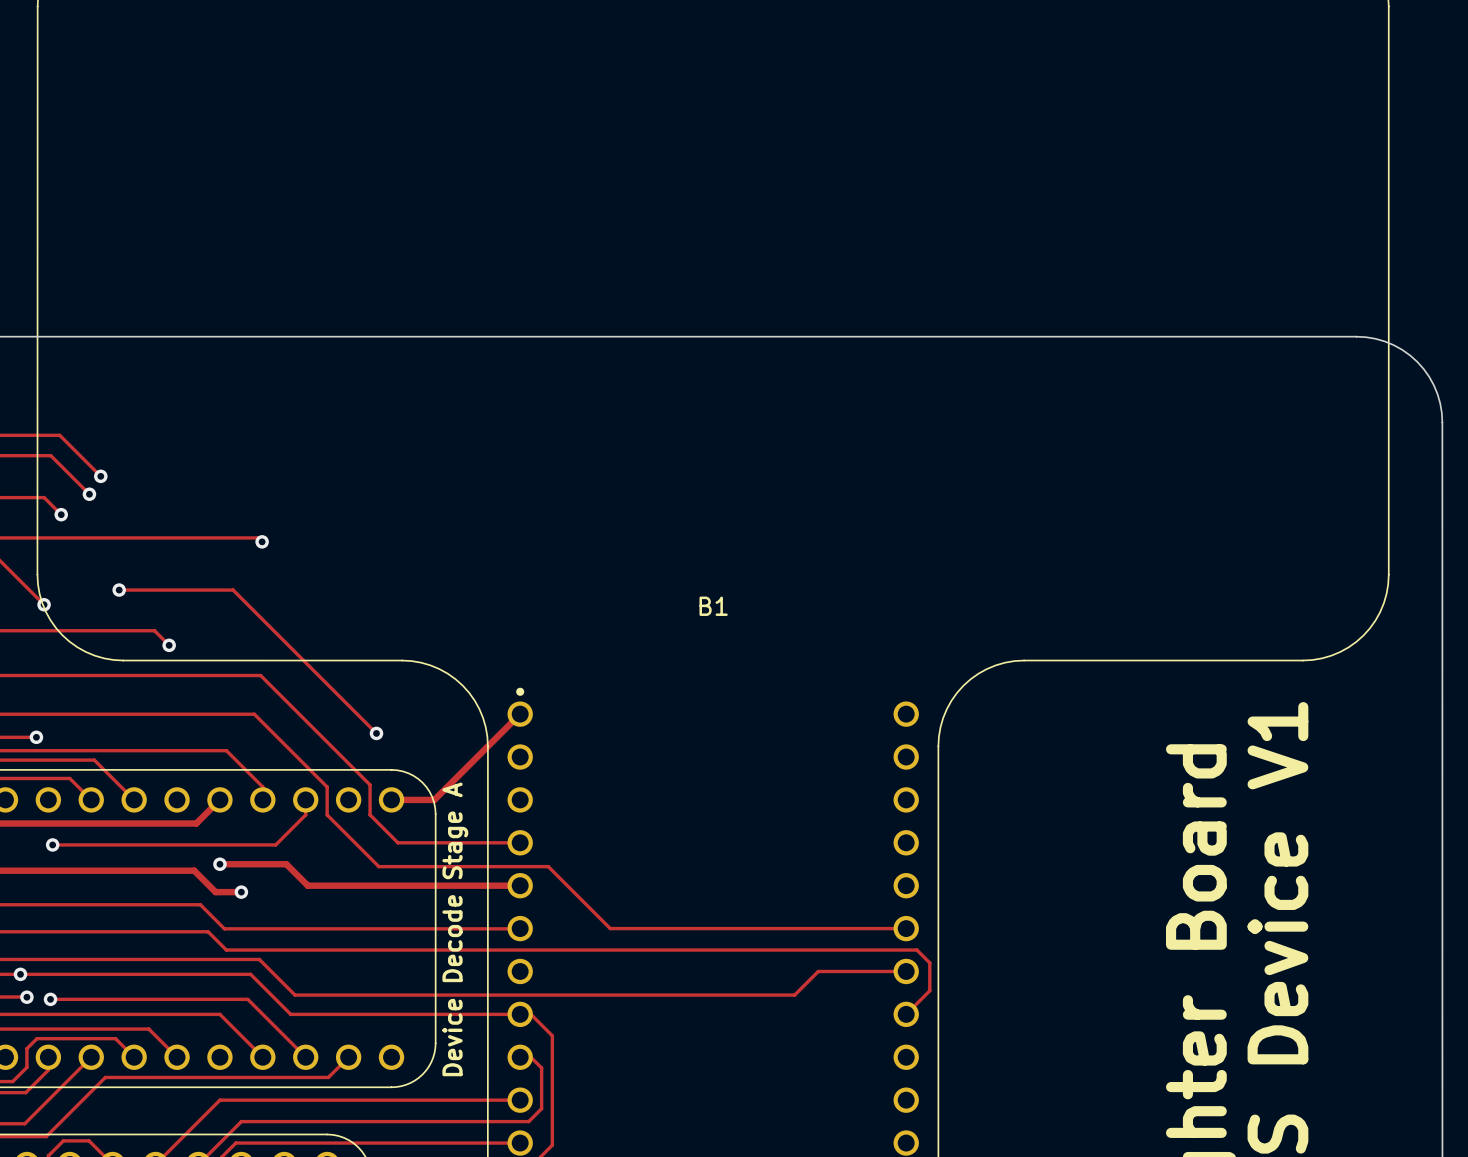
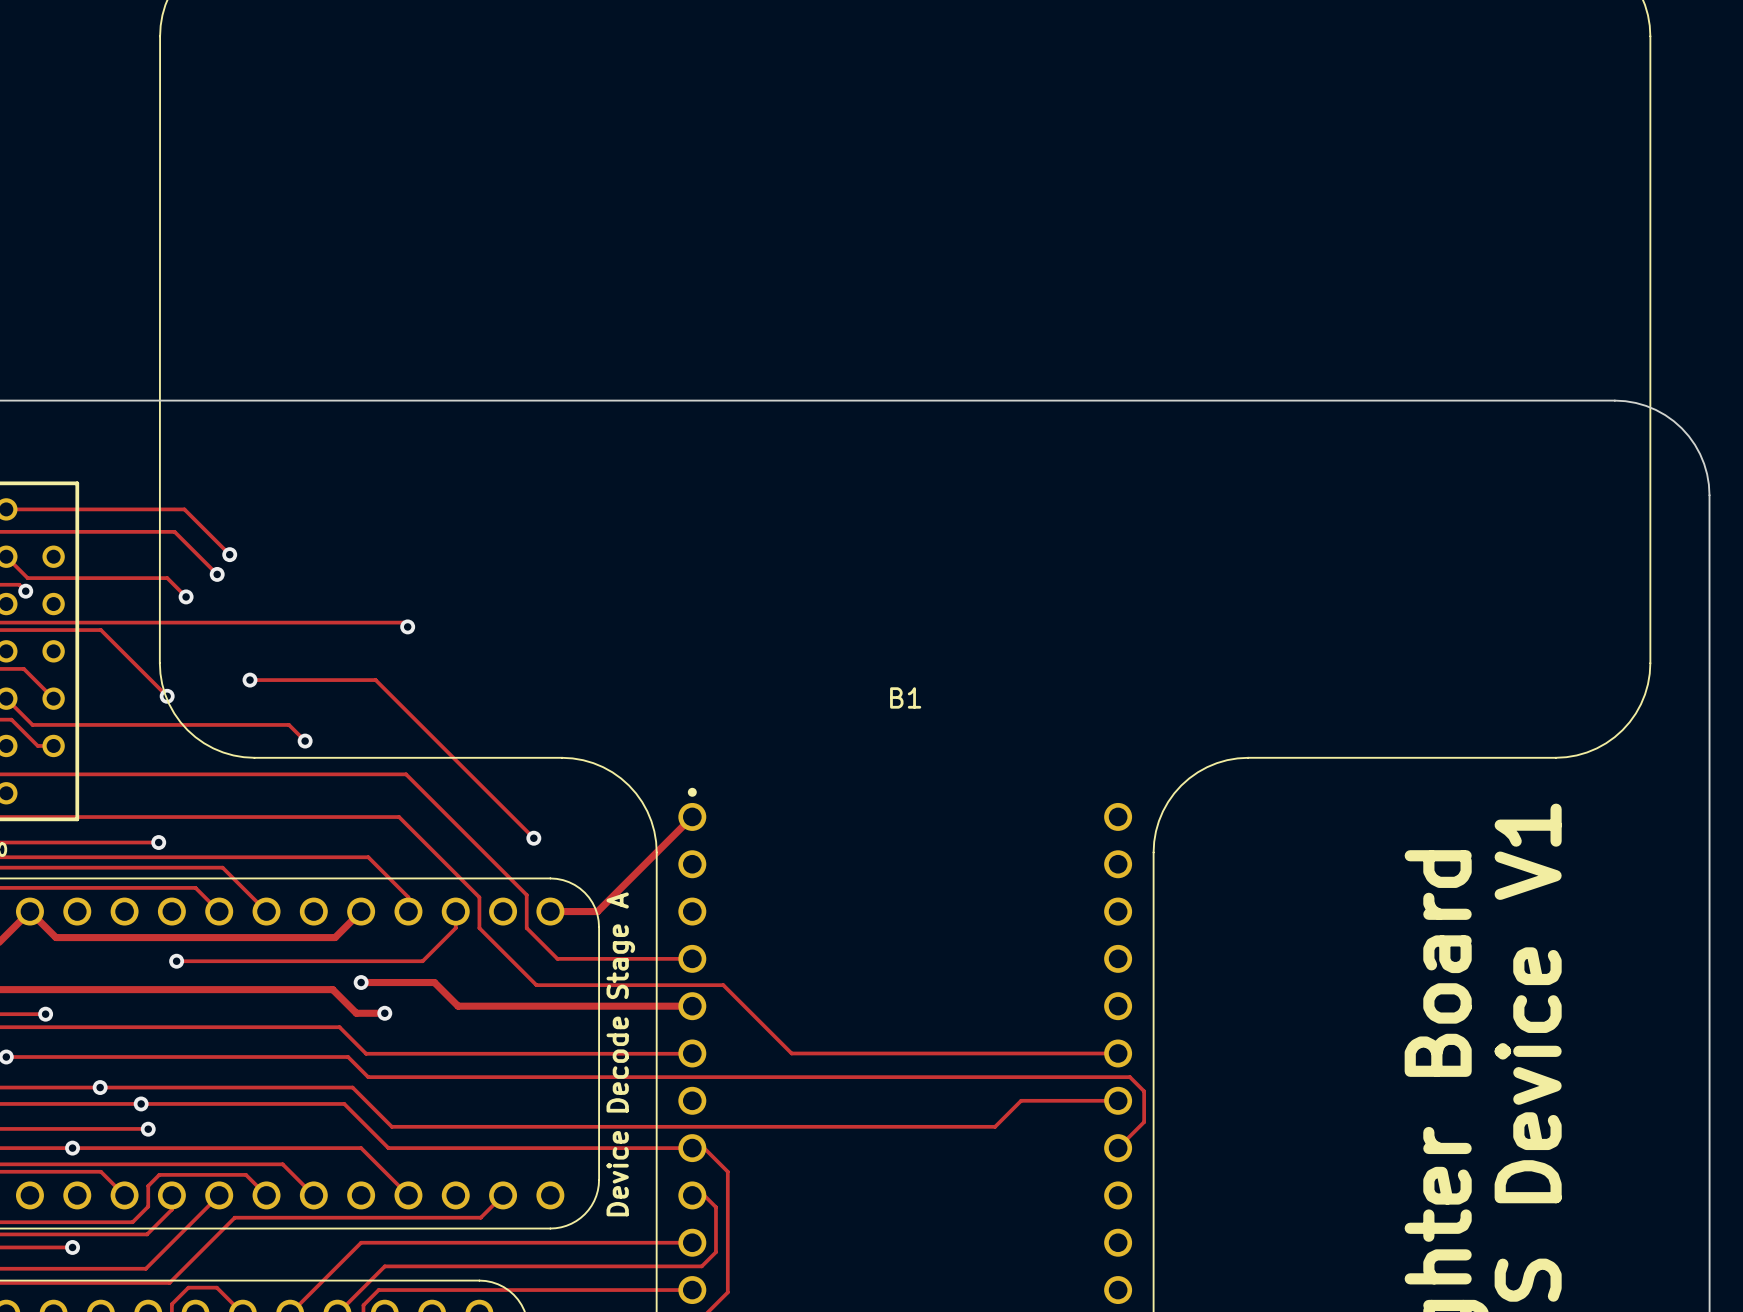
track: (212, 959) (259, 959) (295, 995) -> (352, 1087) (391, 1126) (443, 1126)
track: (204, 974) (250, 974) (290, 1014) -> (344, 1103) (388, 1148) (439, 1148)
track: (50, 999) (247, 999) (305, 1057) -> none
via: (50, 999) -> none

